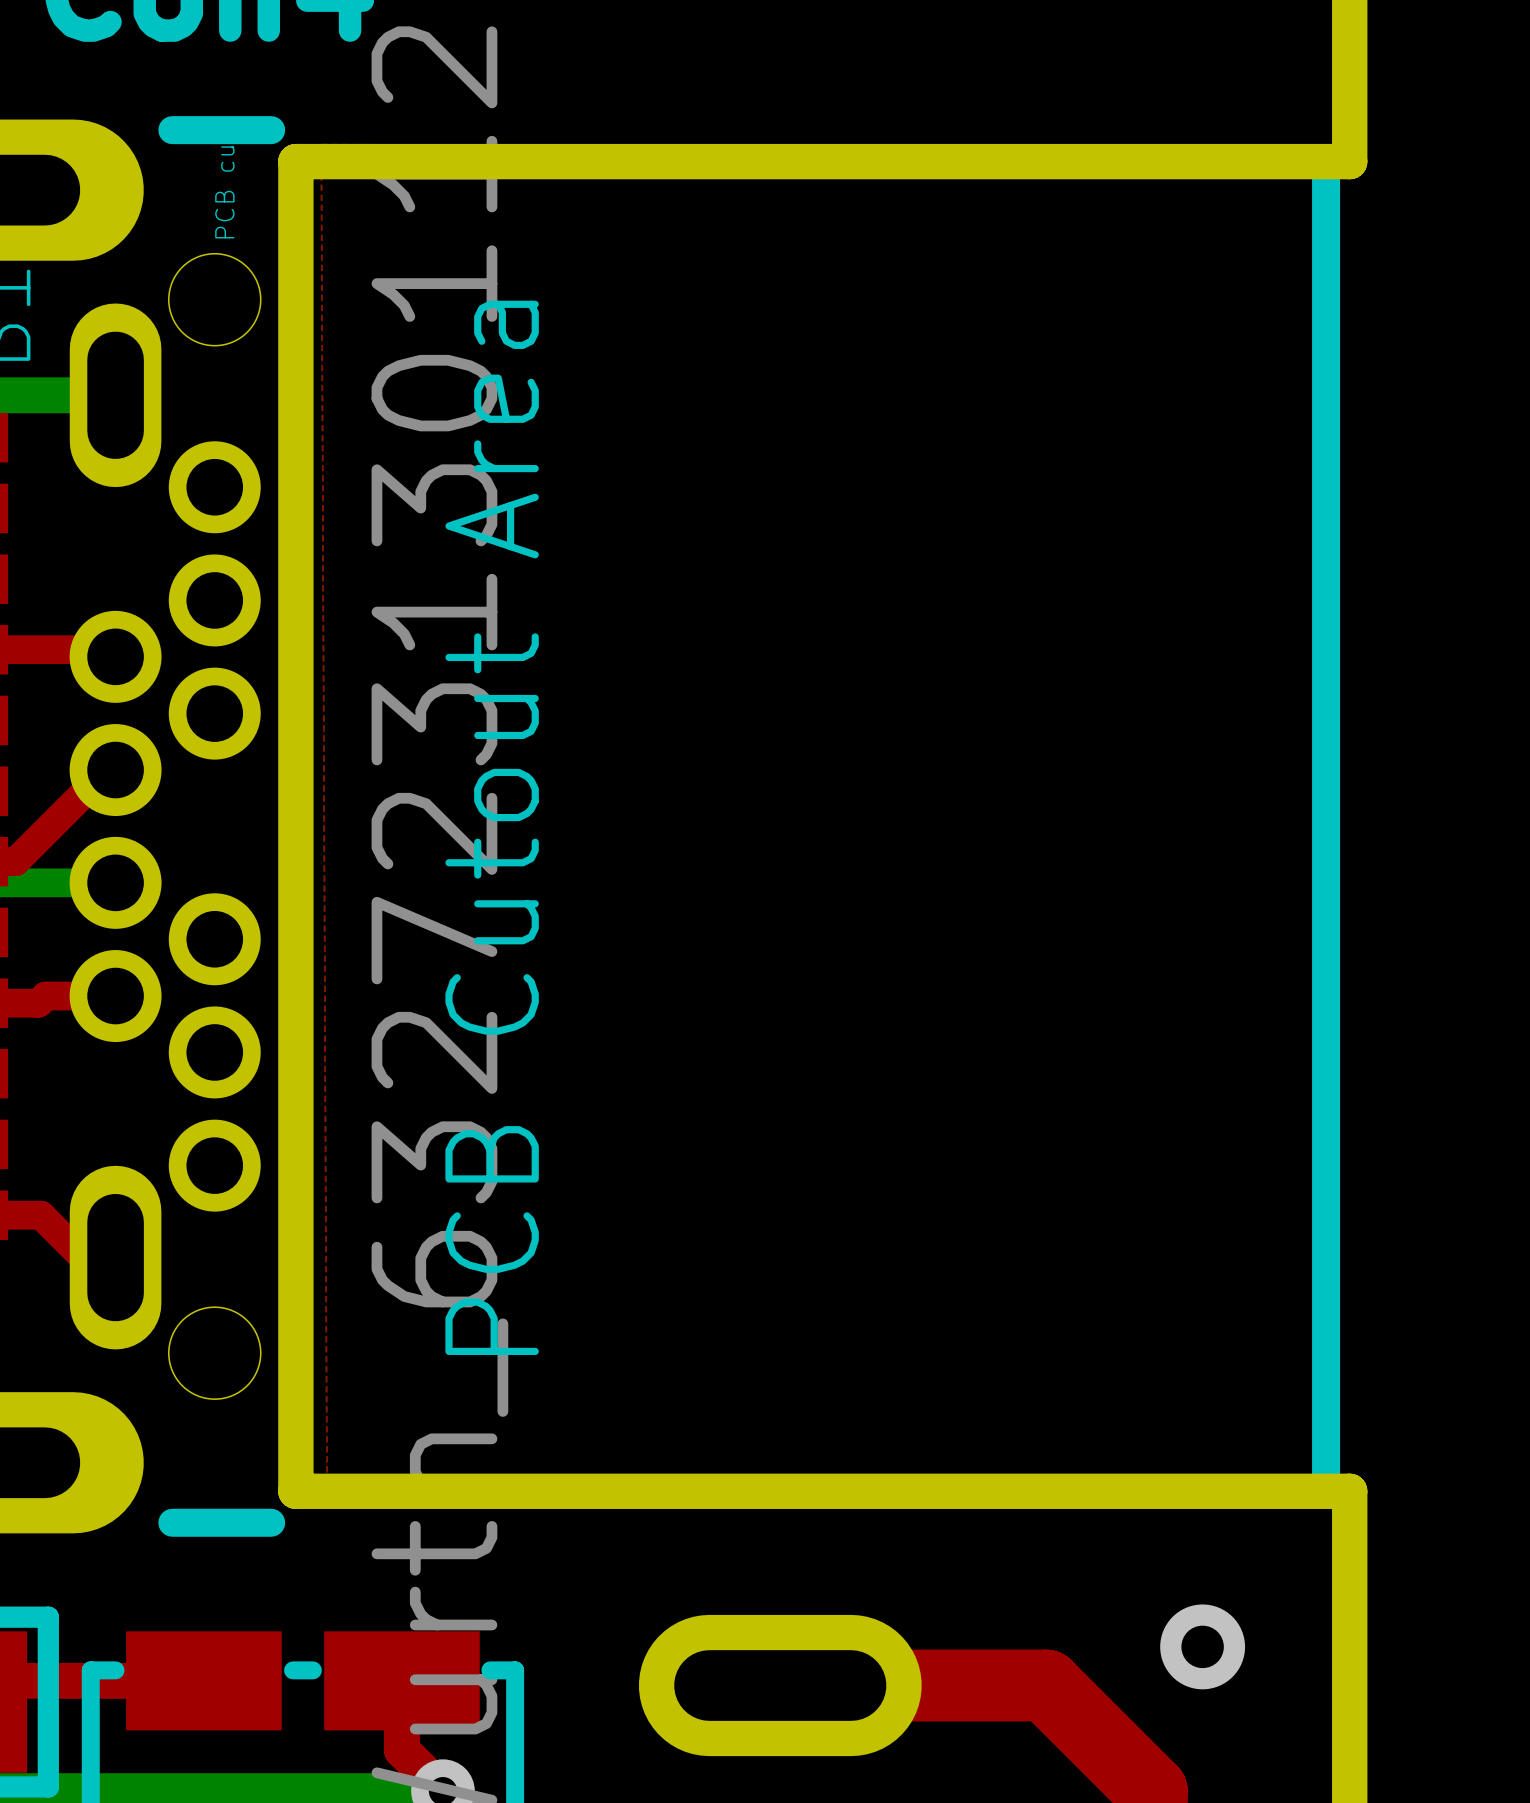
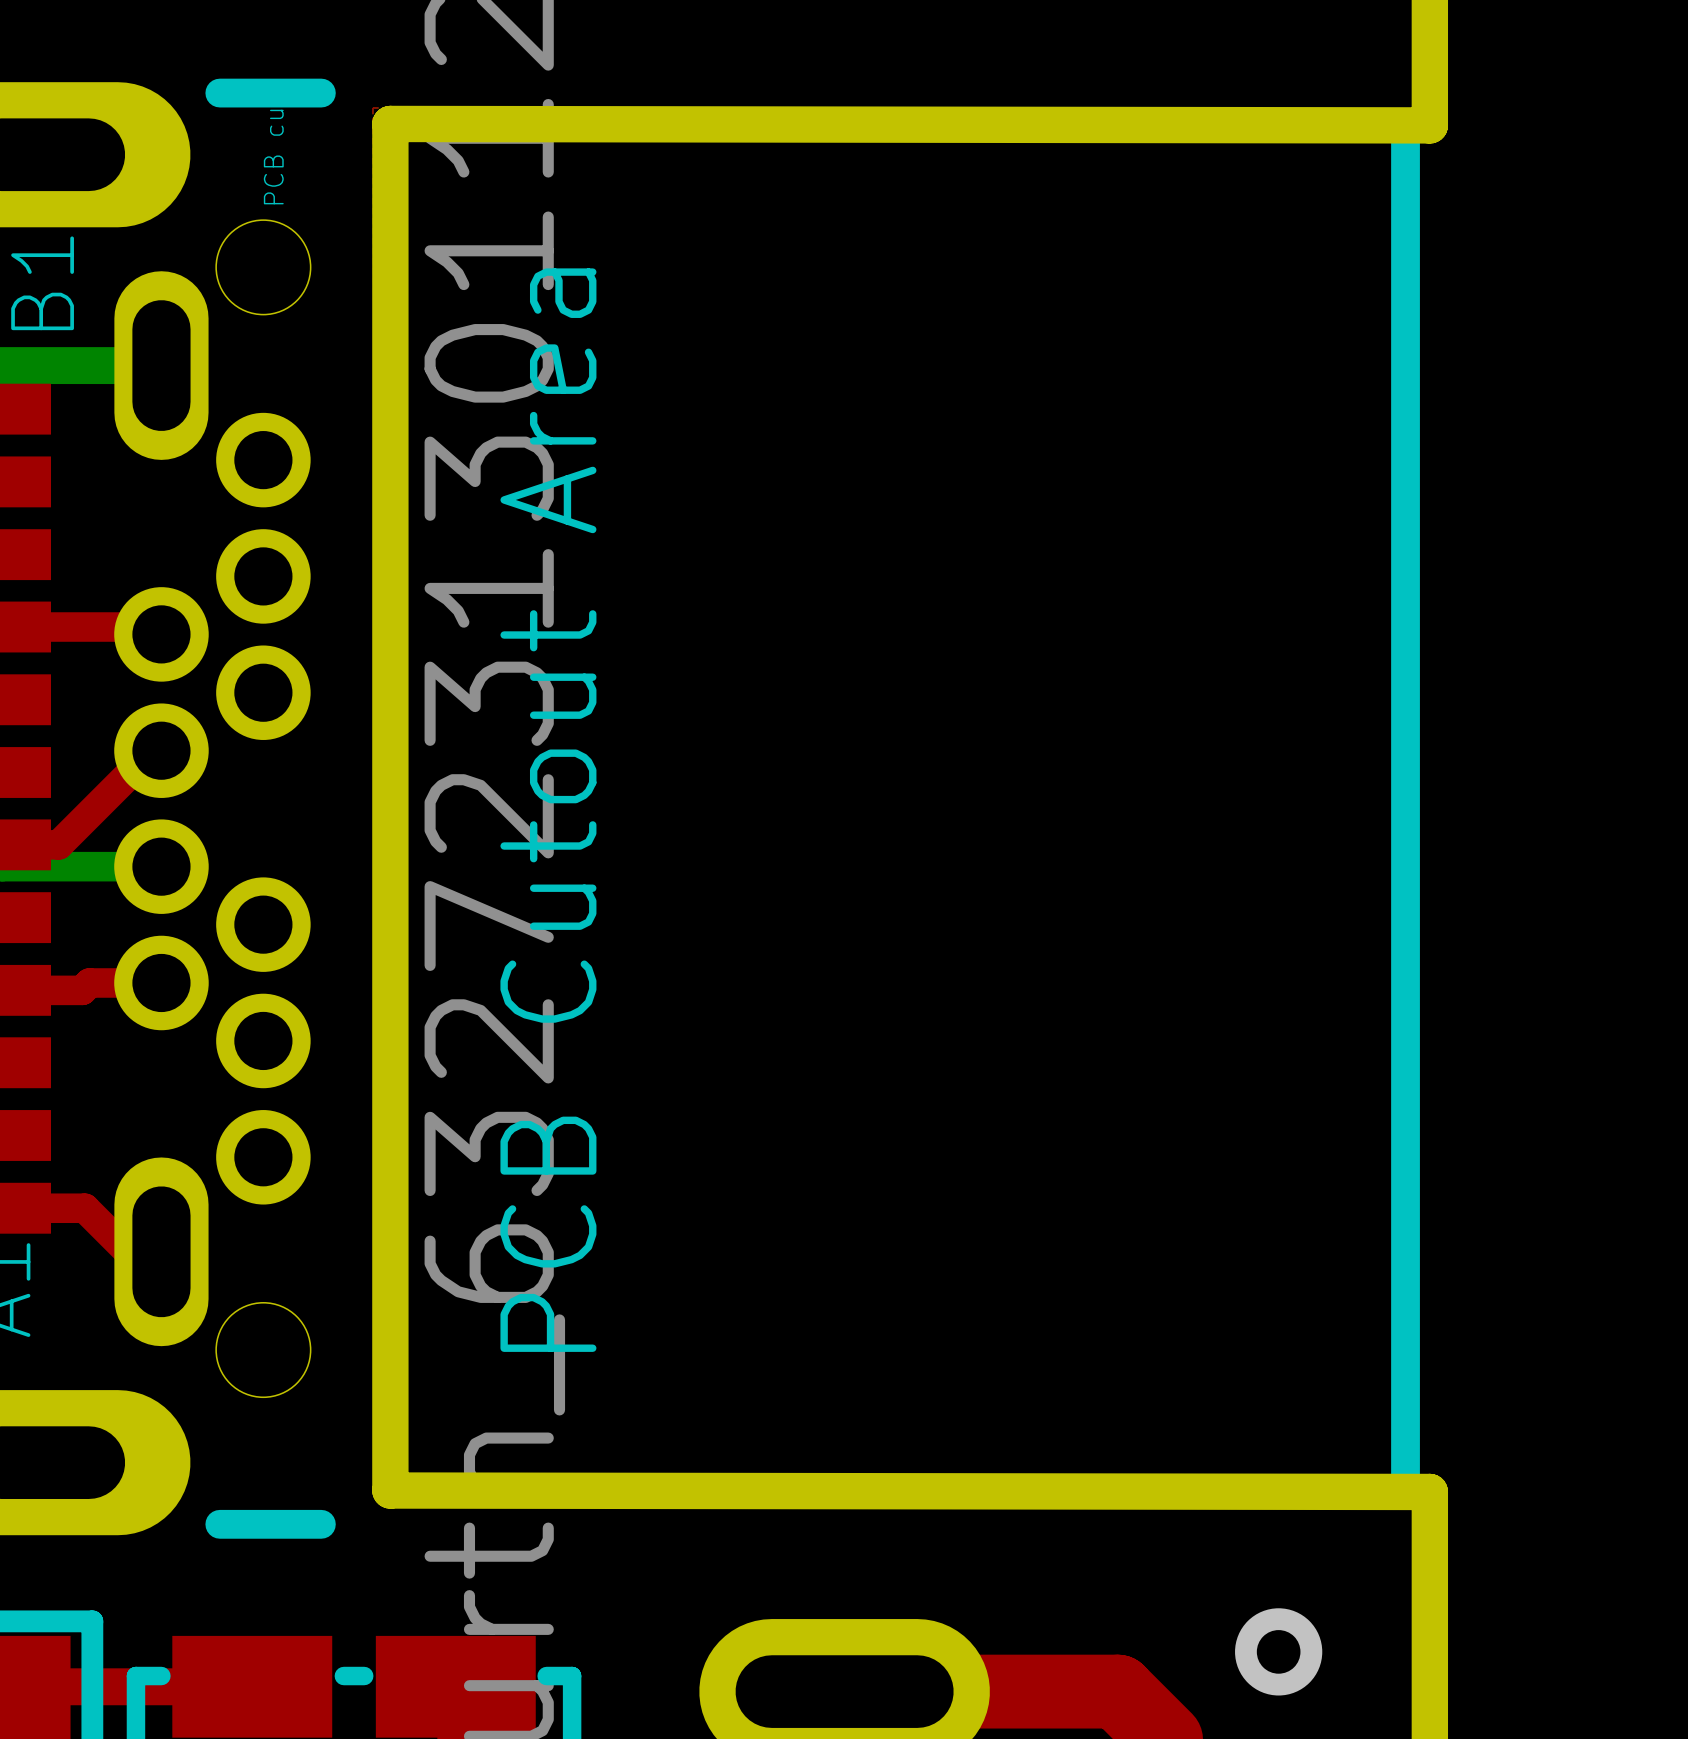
board edge: (1349, 161) (295, 161) (295, 1491) (1349, 1491) -> (1429, 125) (390, 123) (390, 1490) (1429, 1491)

